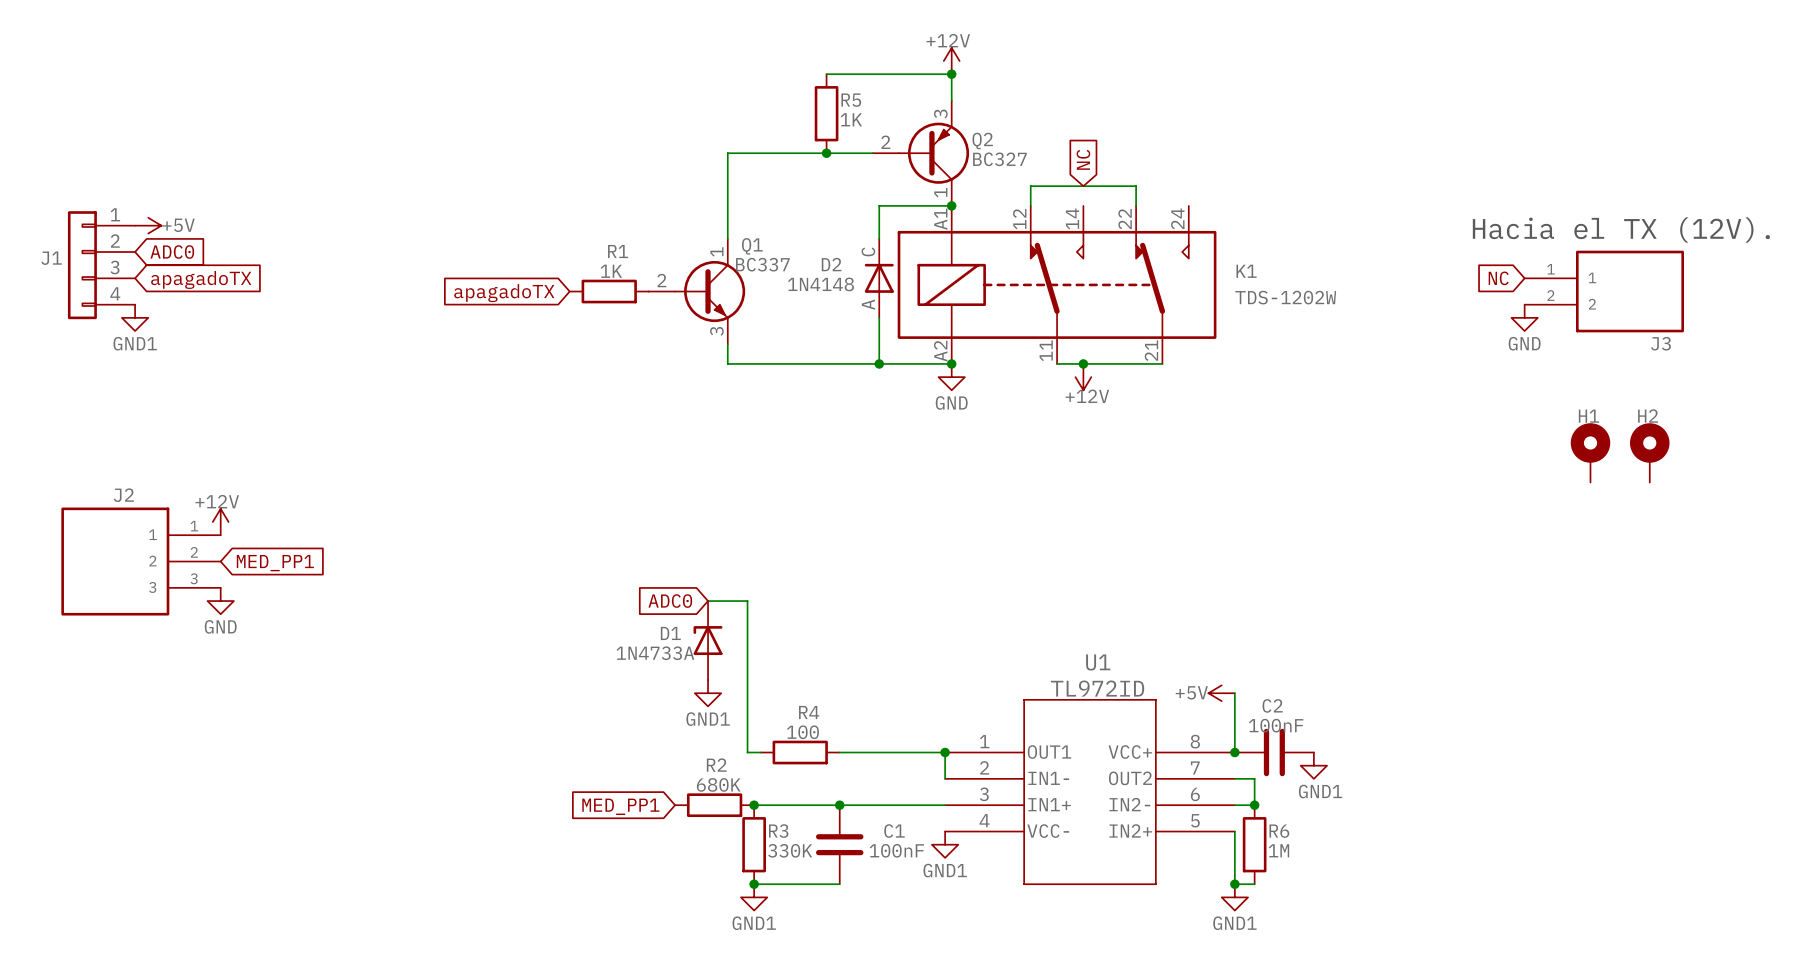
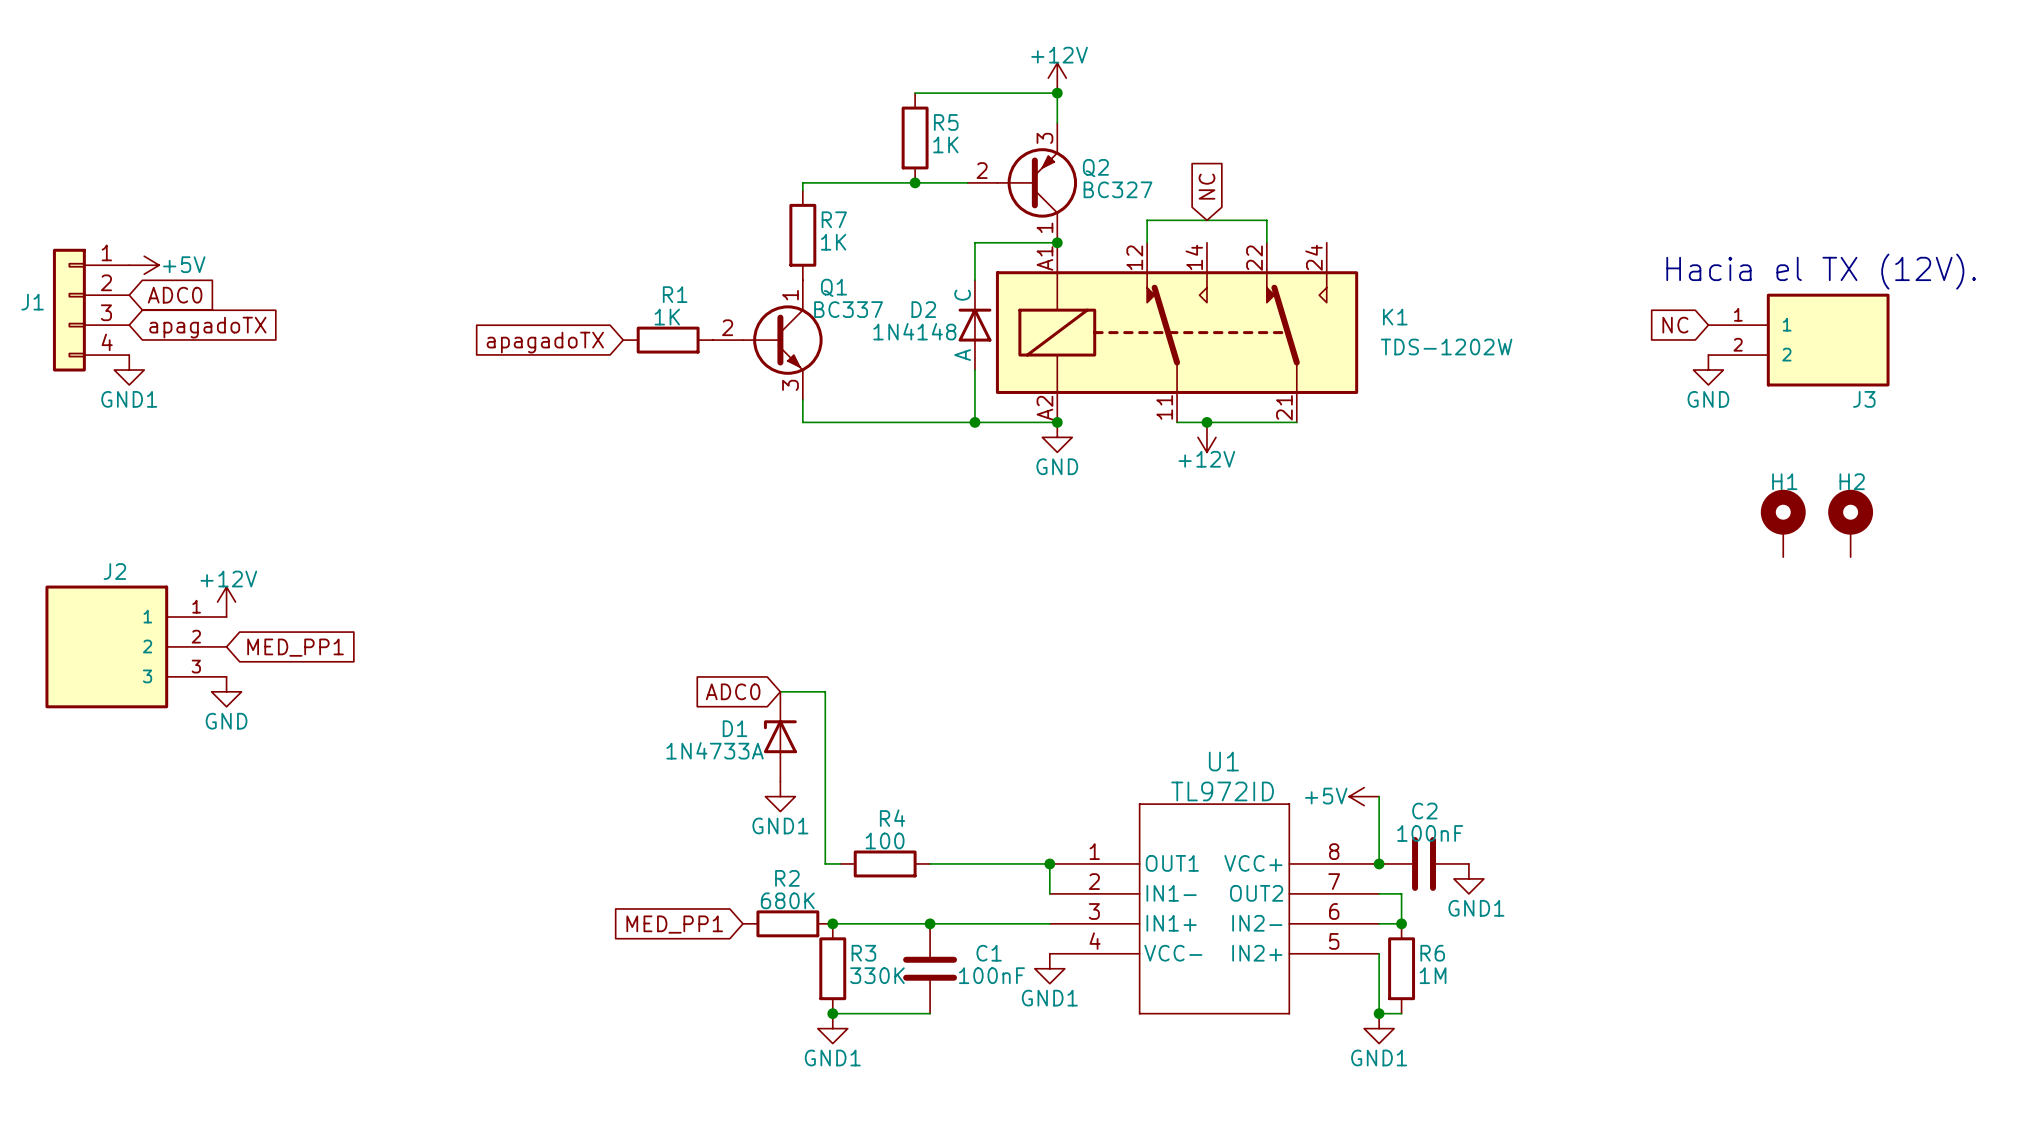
wire: (727, 159) (727, 238) -> none
R7: none -> 1K (802, 235)

